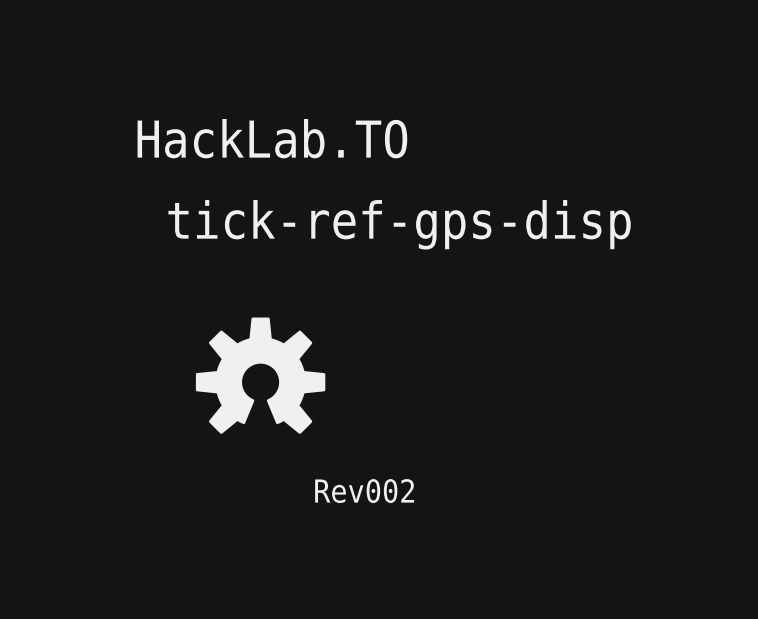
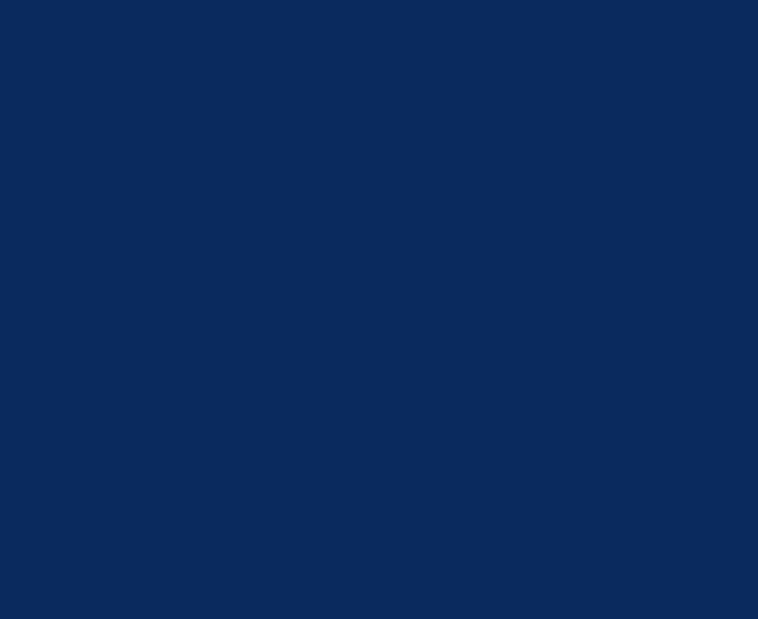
text: HackLab.TO (272, 138) -> none
text: tick-ref-gps-disp (399, 224) -> none
drawing: [195, 317, 326, 434] -> none
text: Rev002 (364, 491) -> none

